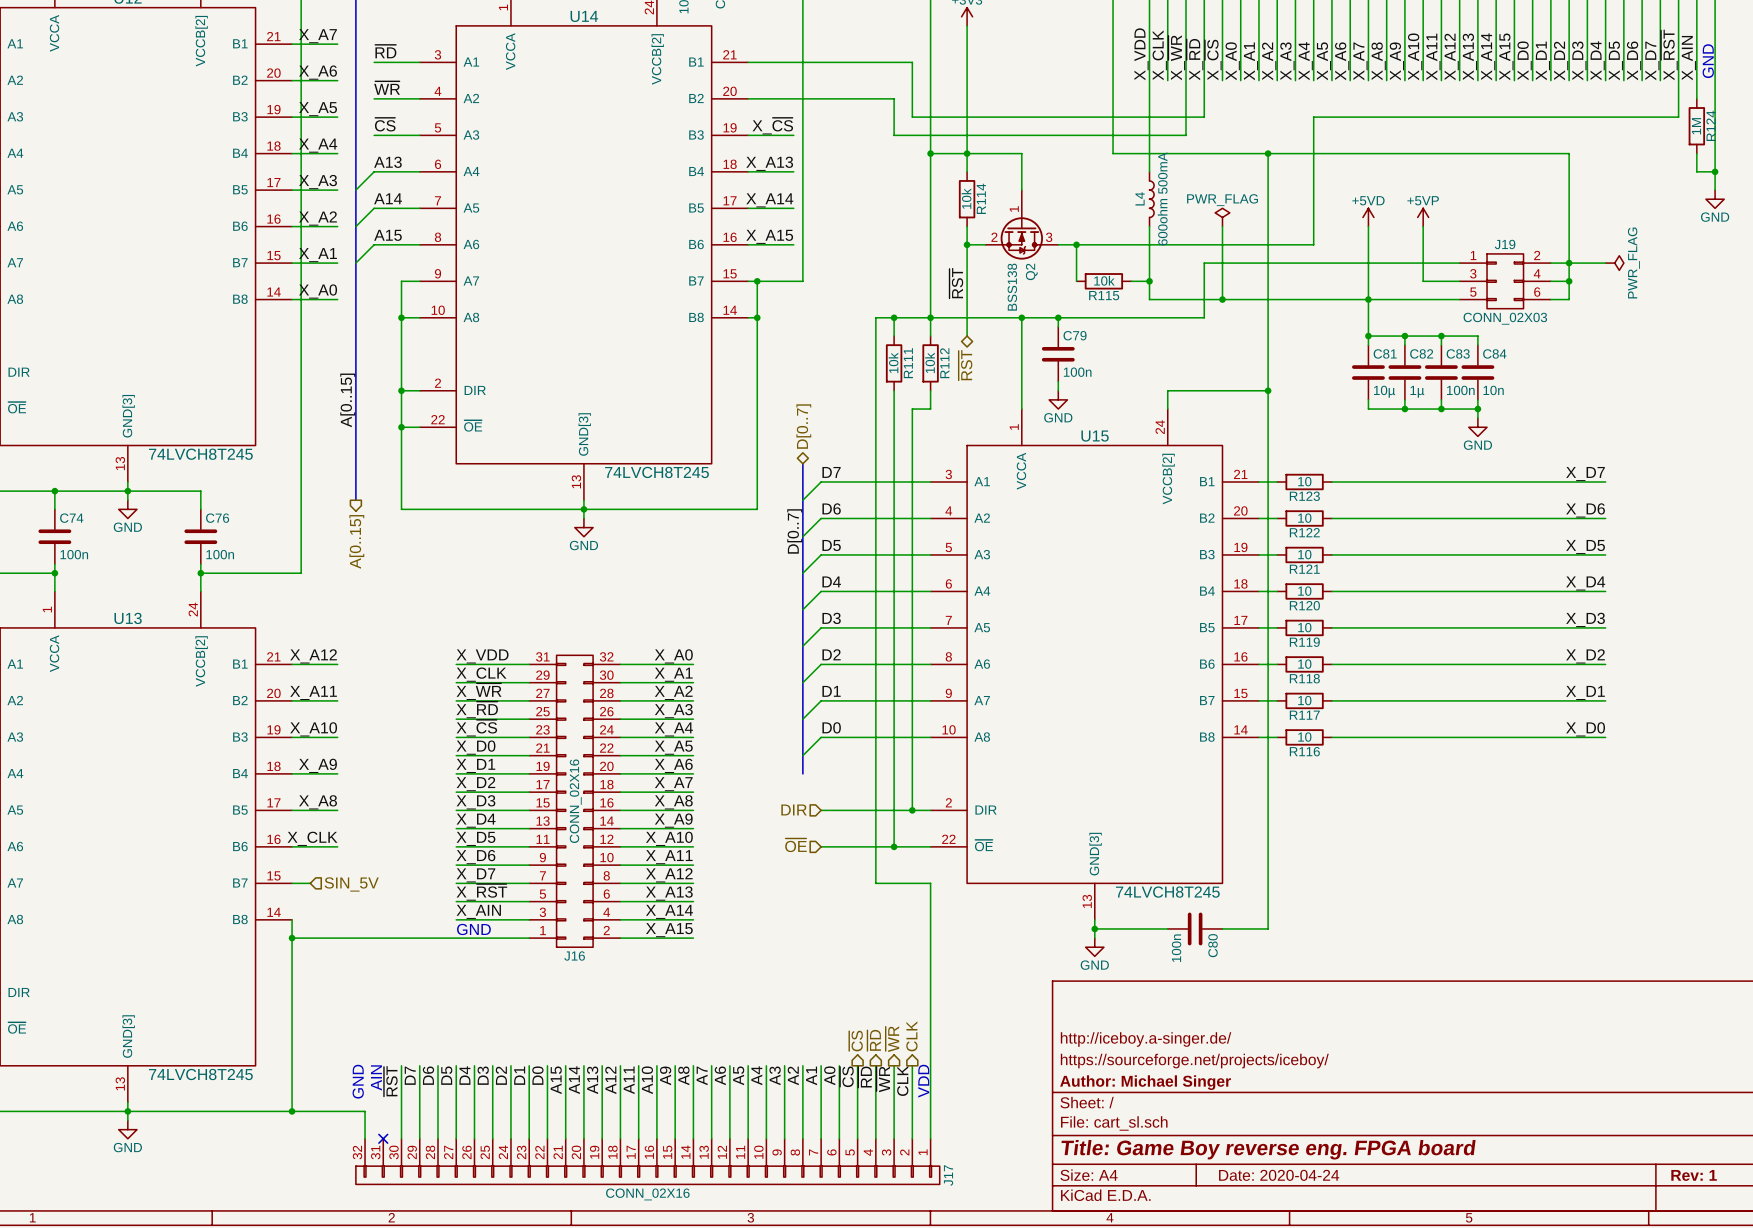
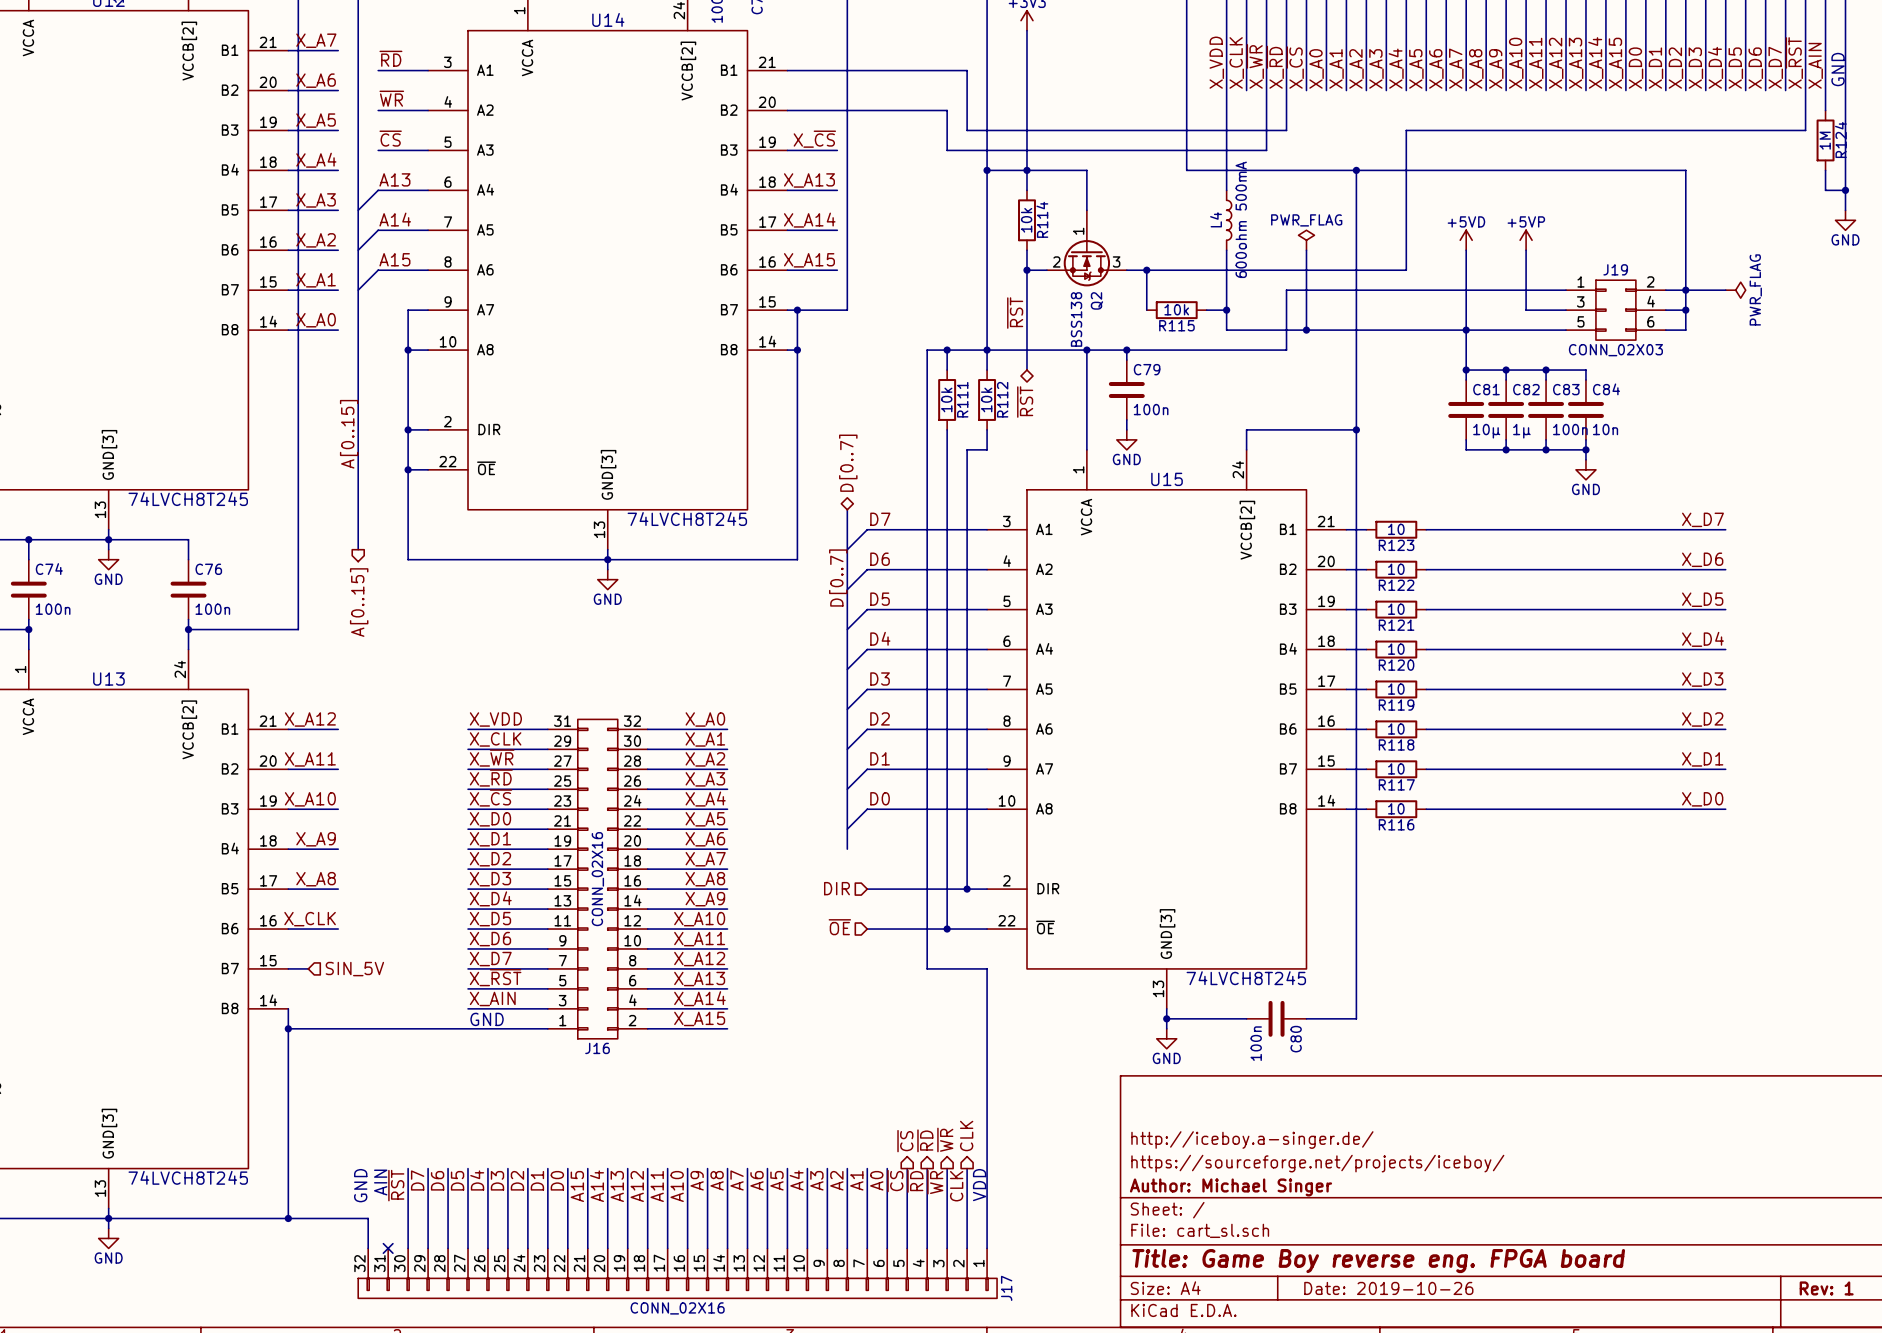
title block: Date: 2020-04-24 (1279, 1175) -> Date: 2019-10-26 (1388, 1288)

